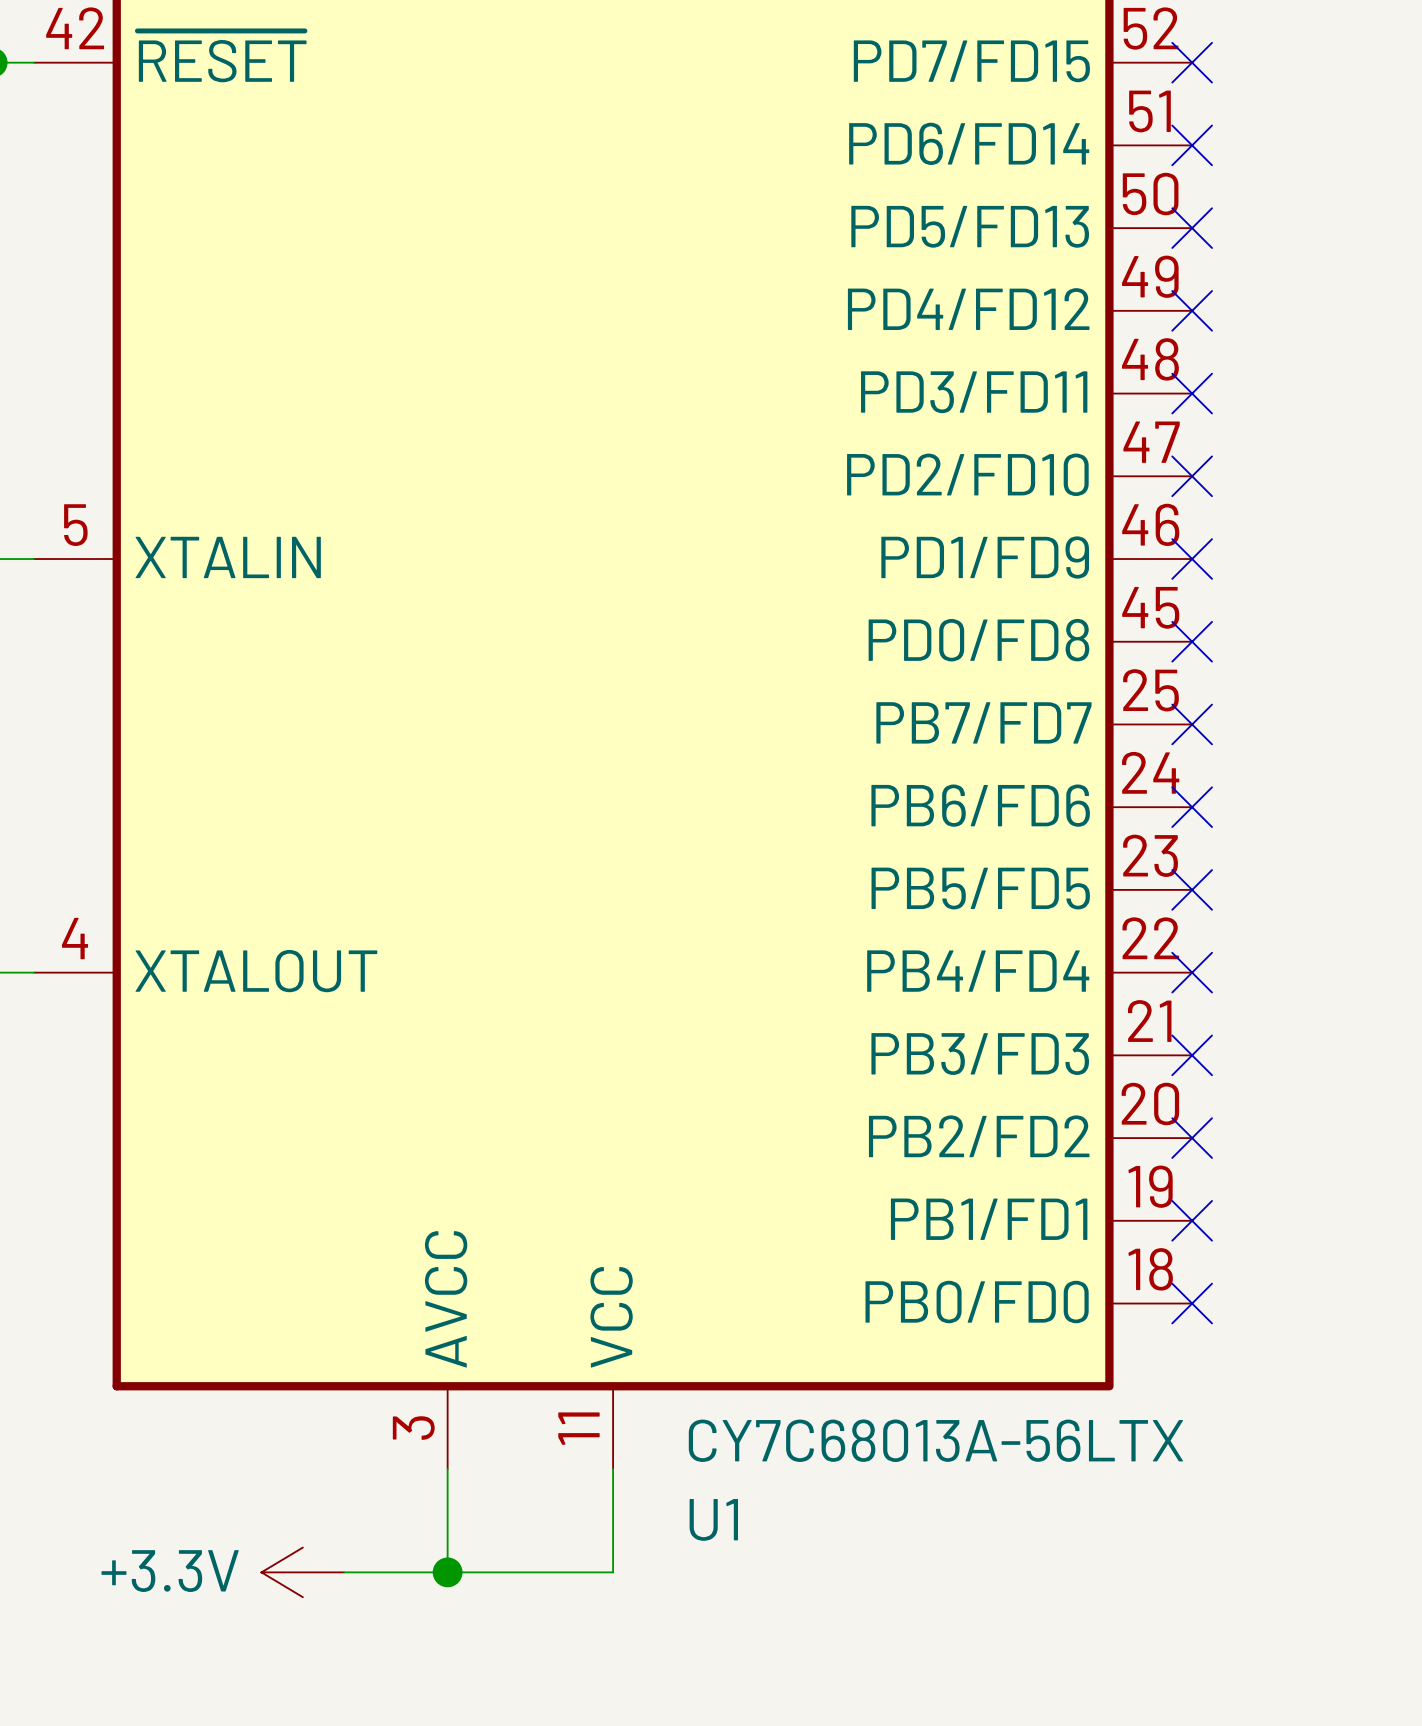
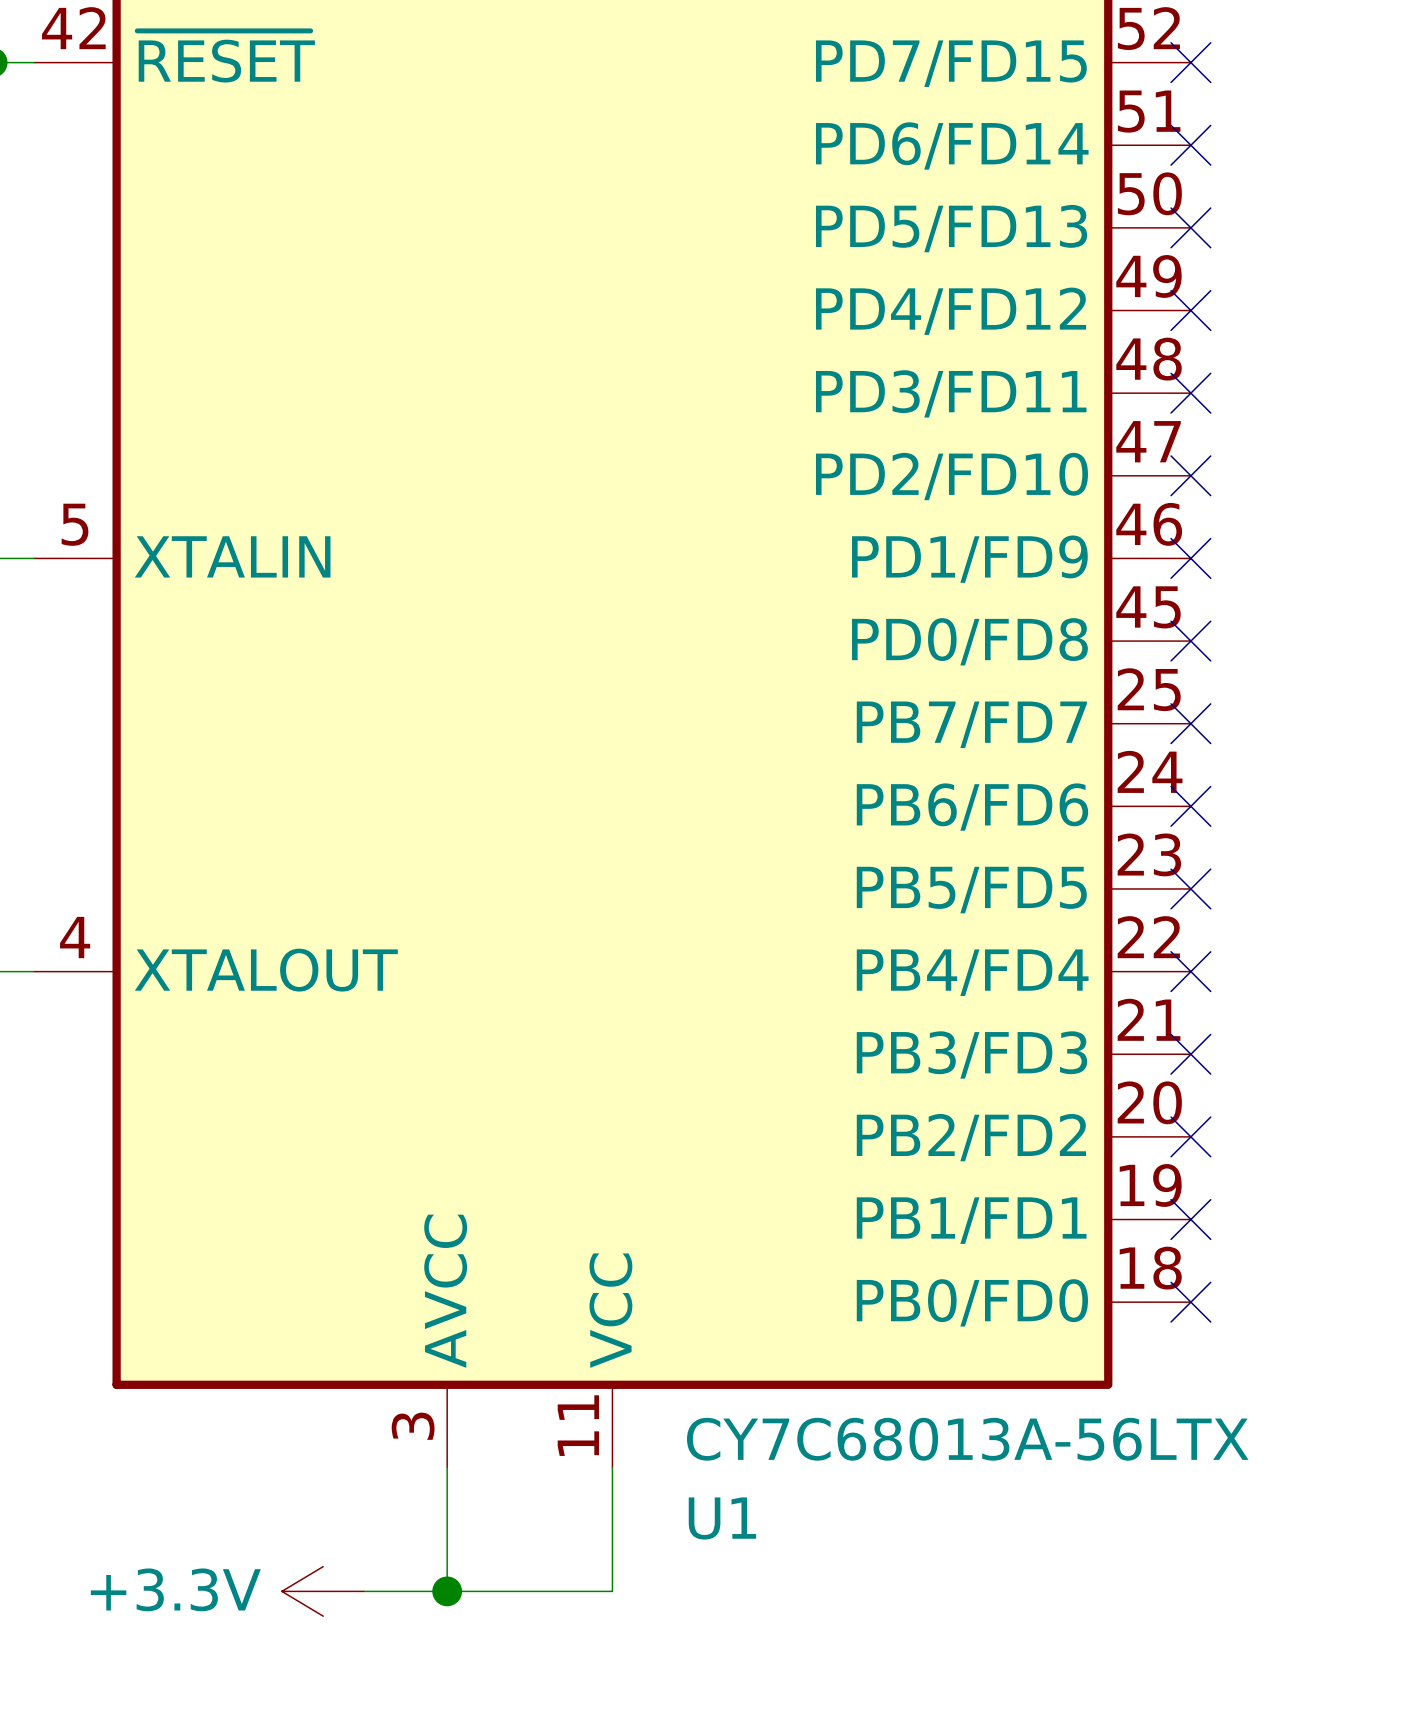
power symbol position: +3.3V (302, 1572) -> +3.3V (323, 1591)
wire: (344, 1572) (613, 1572) -> (364, 1591) (612, 1591) (612, 1570)
junction position: (447, 1572) -> (447, 1591)

